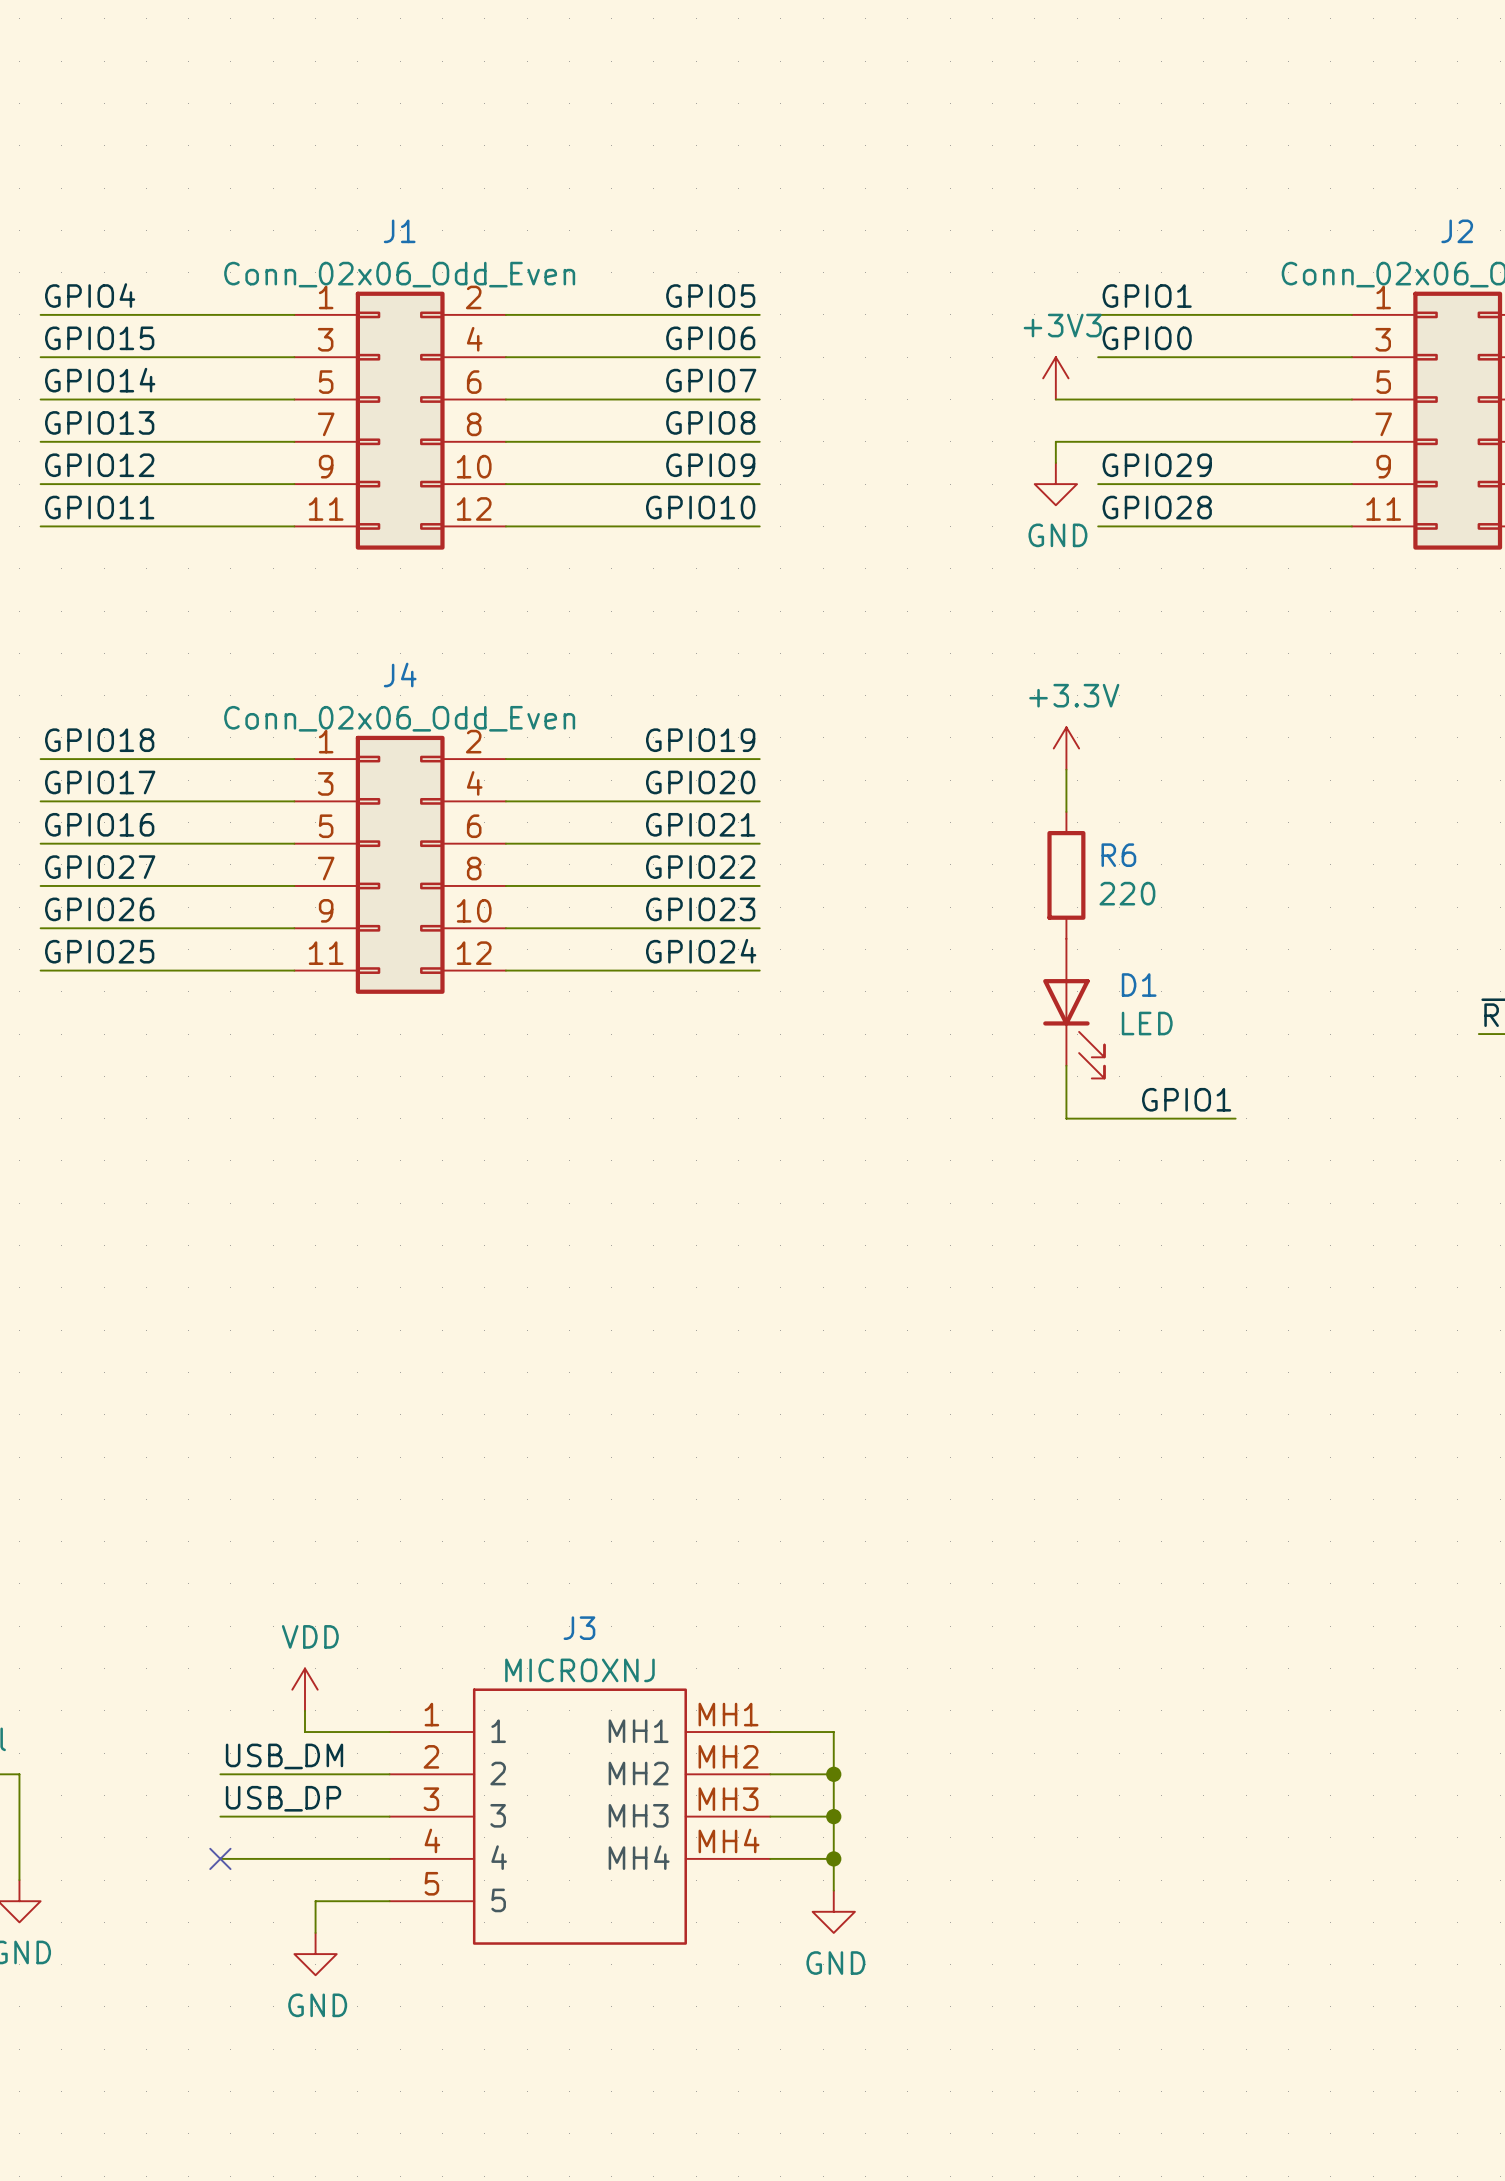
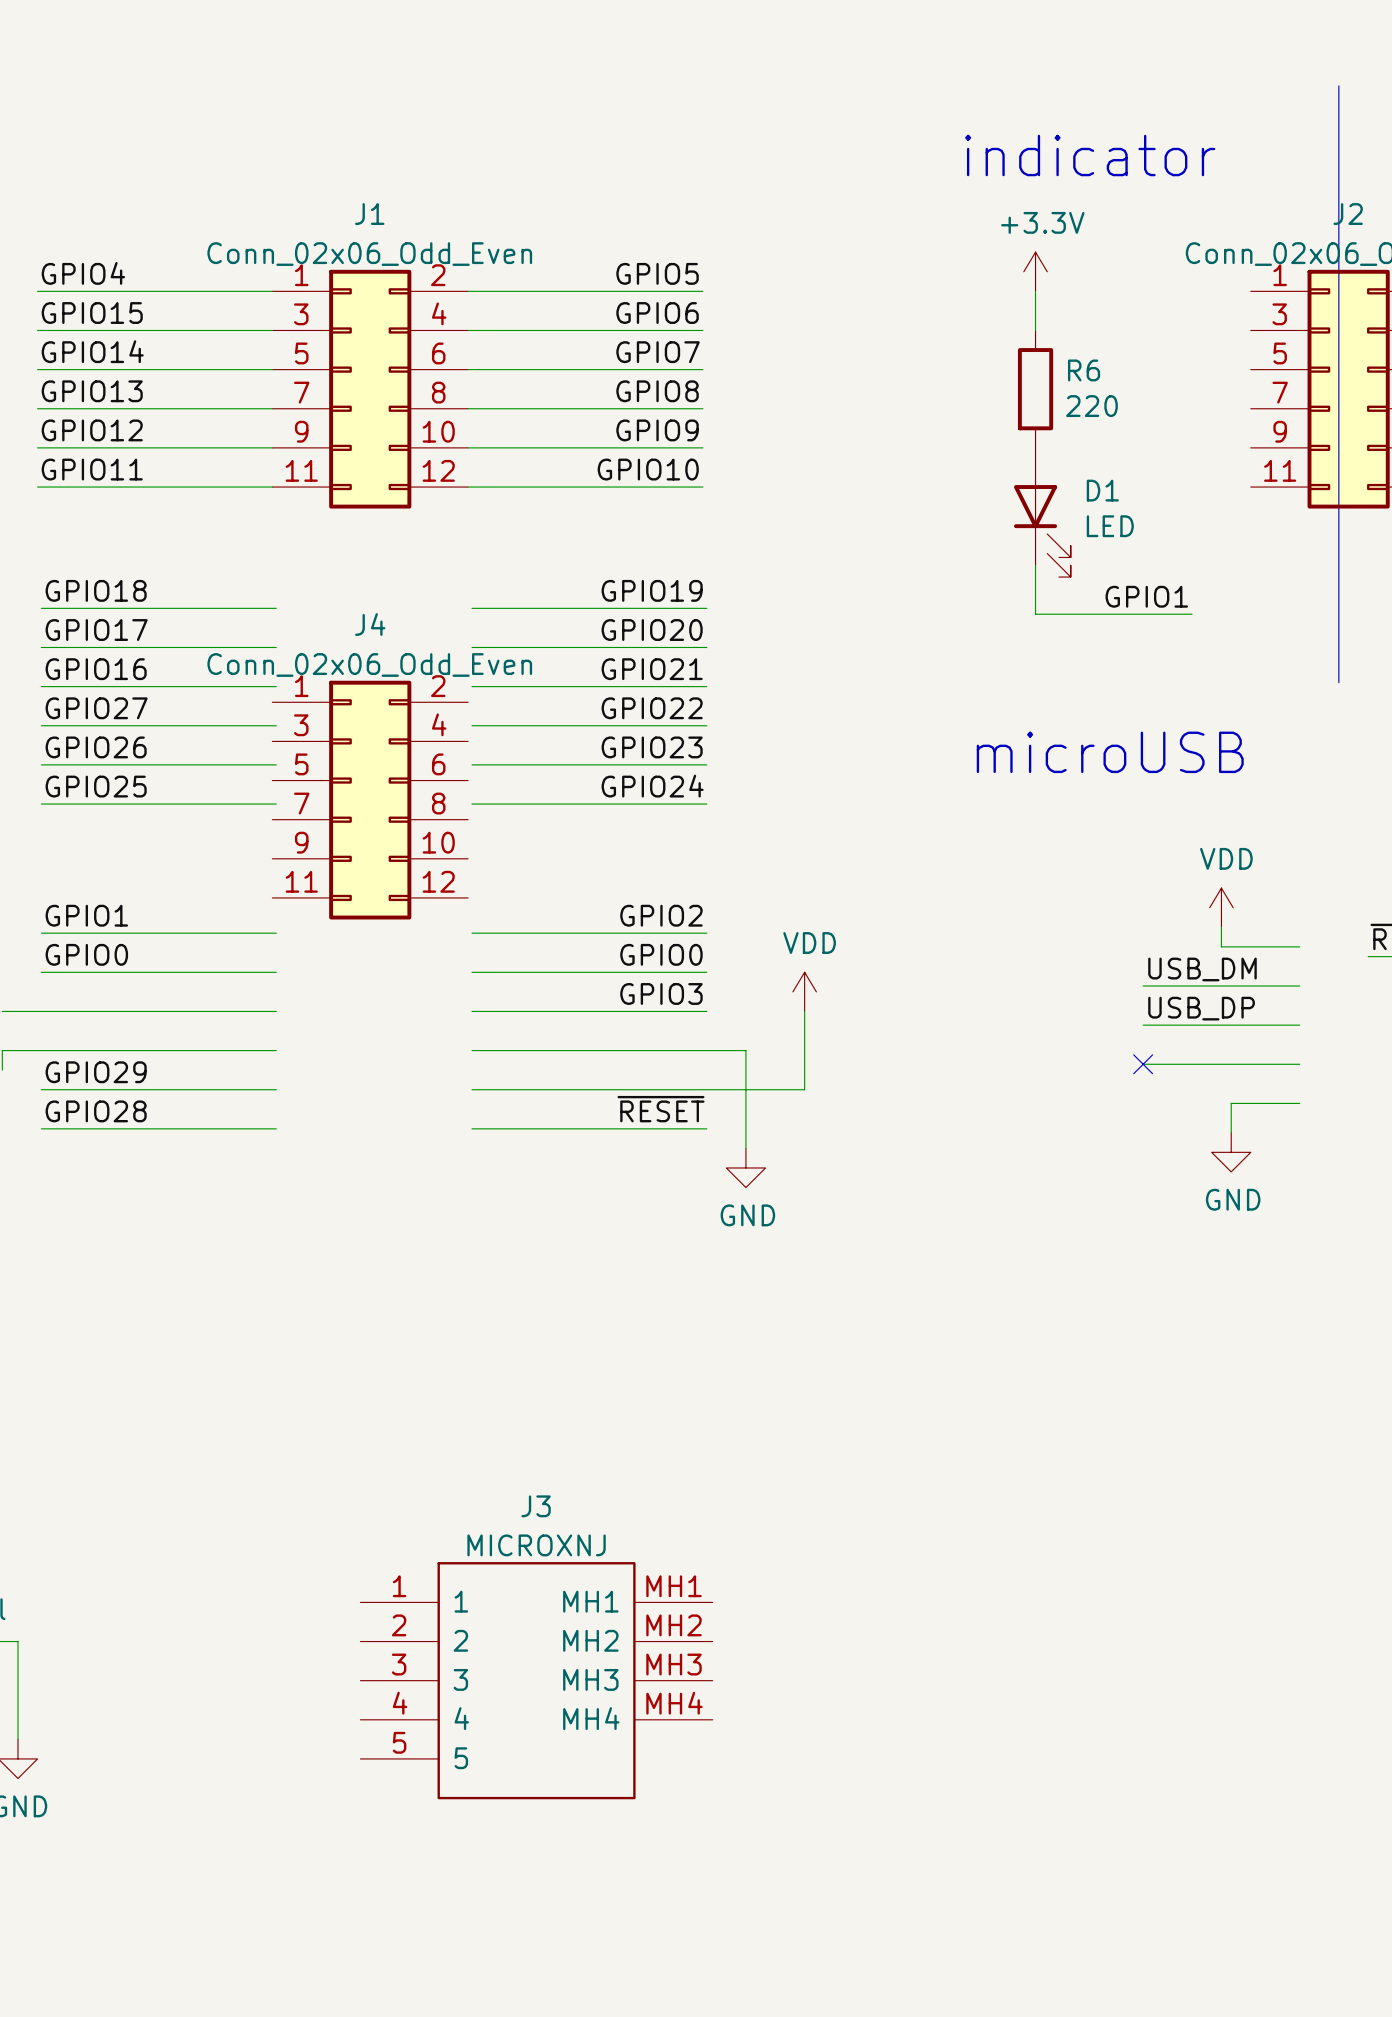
line: none -> (1338, 85) (1338, 682)
text: none -> indicator (1090, 155)
power symbol: none -> +3.3V (1035, 271)
label: GPIO1 (1147, 296) -> none
wire: (1098, 314) (1351, 314) -> none
wire: none -> (1035, 291) (1035, 330)
label: GPIO0 (1147, 338) -> none
wire: (1098, 357) (1351, 357) -> none
power symbol: +3V3 (1055, 378) -> none
wire: (1055, 399) (1351, 399) -> none
wire: (1351, 441) (1055, 441) (1055, 462) -> none
label: GPIO29 (1157, 465) -> none
power symbol: GND (1055, 484) -> none
wire: (1098, 484) (1351, 484) -> none
label: GPIO28 (1157, 507) -> none
wire: (1098, 526) (1351, 526) -> none
wire: none -> (1035, 565) (1035, 614) (1192, 614)
label: none -> GPIO1 (1146, 596)
label position: GPIO18 (99, 740) -> GPIO18 (96, 590)
label position: GPIO19 (700, 740) -> GPIO19 (652, 590)
power symbol: +3.3V (1066, 748) -> none
wire: (40, 759) (294, 759) -> (41, 608) (276, 608)
wire: (505, 759) (759, 759) -> (471, 608) (706, 608)
wire: (1066, 769) (1066, 811) -> none
label position: GPIO17 (100, 782) -> GPIO17 (96, 630)
label position: GPIO20 (700, 782) -> GPIO20 (652, 630)
wire: (40, 801) (294, 801) -> (41, 647) (276, 647)
wire: (505, 801) (759, 801) -> (471, 647) (706, 647)
text: none -> microUSB (1110, 752)
label position: GPIO16 (99, 824) -> GPIO16 (96, 669)
label position: GPIO21 (700, 824) -> GPIO21 (652, 669)
wire: (40, 843) (294, 843) -> (41, 686) (276, 686)
wire: (505, 843) (759, 843) -> (471, 686) (706, 686)
label position: GPIO27 (100, 867) -> GPIO27 (96, 708)
label position: GPIO22 (700, 867) -> GPIO22 (652, 708)
R6 position: (1066, 875) -> (1035, 389)
wire: (40, 885) (294, 885) -> (41, 725) (276, 725)
wire: (505, 885) (759, 885) -> (471, 725) (706, 725)
label position: GPIO26 (99, 909) -> GPIO26 (96, 747)
label position: GPIO23 (700, 909) -> GPIO23 (652, 747)
wire: (40, 928) (294, 928) -> (41, 764) (276, 764)
wire: (505, 928) (759, 928) -> (471, 764) (706, 764)
label position: GPIO25 (99, 951) -> GPIO25 (96, 786)
label position: GPIO24 (701, 951) -> GPIO24 (652, 786)
wire: (40, 970) (294, 970) -> (41, 804) (276, 804)
wire: (505, 970) (759, 970) -> (471, 804) (706, 804)
power symbol: none -> VDD (1221, 907)
label: none -> GPIO1 (86, 915)
label: none -> GPIO2 (661, 915)
wire: none -> (1221, 927) (1221, 946) (1299, 946)
wire: none -> (41, 933) (276, 933)
wire: none -> (471, 933) (706, 933)
D1 position: (1073, 1008) -> (1042, 512)
label: none -> GPIO0 (86, 954)
label: none -> GPIO0 (661, 954)
label: none -> USB_DM (1202, 969)
wire: none -> (41, 972) (276, 972)
wire: none -> (471, 972) (706, 972)
wire: (1066, 1065) (1066, 1118) (1235, 1118) -> none
wire: none -> (1143, 986) (1299, 986)
power symbol: none -> VDD (804, 991)
label: none -> GPIO3 (661, 993)
wire: none -> (2, 1011) (276, 1011)
wire: none -> (471, 1011) (706, 1011)
wire: none -> (804, 1011) (804, 1089) (471, 1089)
label: GPIO1 (1186, 1099) -> USB_DP (1201, 1008)
wire: none -> (1143, 1025) (1299, 1025)
wire: none -> (276, 1050) (2, 1050) (2, 1070)
wire: none -> (471, 1050) (745, 1050) (745, 1148)
wire: none -> (1143, 1064) (1299, 1064)
no-connect mark: none -> (1143, 1064)
label: none -> GPIO29 (96, 1072)
wire: none -> (41, 1089) (276, 1089)
wire: none -> (1299, 1103) (1231, 1103) (1231, 1132)
label: none -> ~{RESET} (661, 1109)
label: none -> GPIO28 (96, 1111)
wire: none -> (41, 1128) (276, 1128)
wire: none -> (471, 1128) (706, 1128)
power symbol: none -> GND (1231, 1152)
power symbol: none -> GND (745, 1167)
power symbol: VDD (304, 1689) -> none
wire: (304, 1710) (304, 1732) (389, 1732) -> none
wire: (770, 1732) (833, 1732) (833, 1890) -> none
label: USB_DM (284, 1756) -> none
wire: (220, 1774) (389, 1774) -> none
wire: (770, 1774) (833, 1774) -> none
junction: (833, 1774) -> none
label: USB_DP (283, 1798) -> none
wire: (220, 1816) (389, 1816) -> none
wire: (770, 1816) (833, 1816) -> none
junction: (833, 1816) -> none
wire: (220, 1858) (389, 1858) -> none
no-connect mark: (220, 1858) -> none
wire: (770, 1858) (833, 1858) -> none
junction: (833, 1858) -> none
wire: (389, 1901) (315, 1901) (315, 1932) -> none
power symbol: GND (833, 1911) -> none
power symbol: GND (315, 1954) -> none

